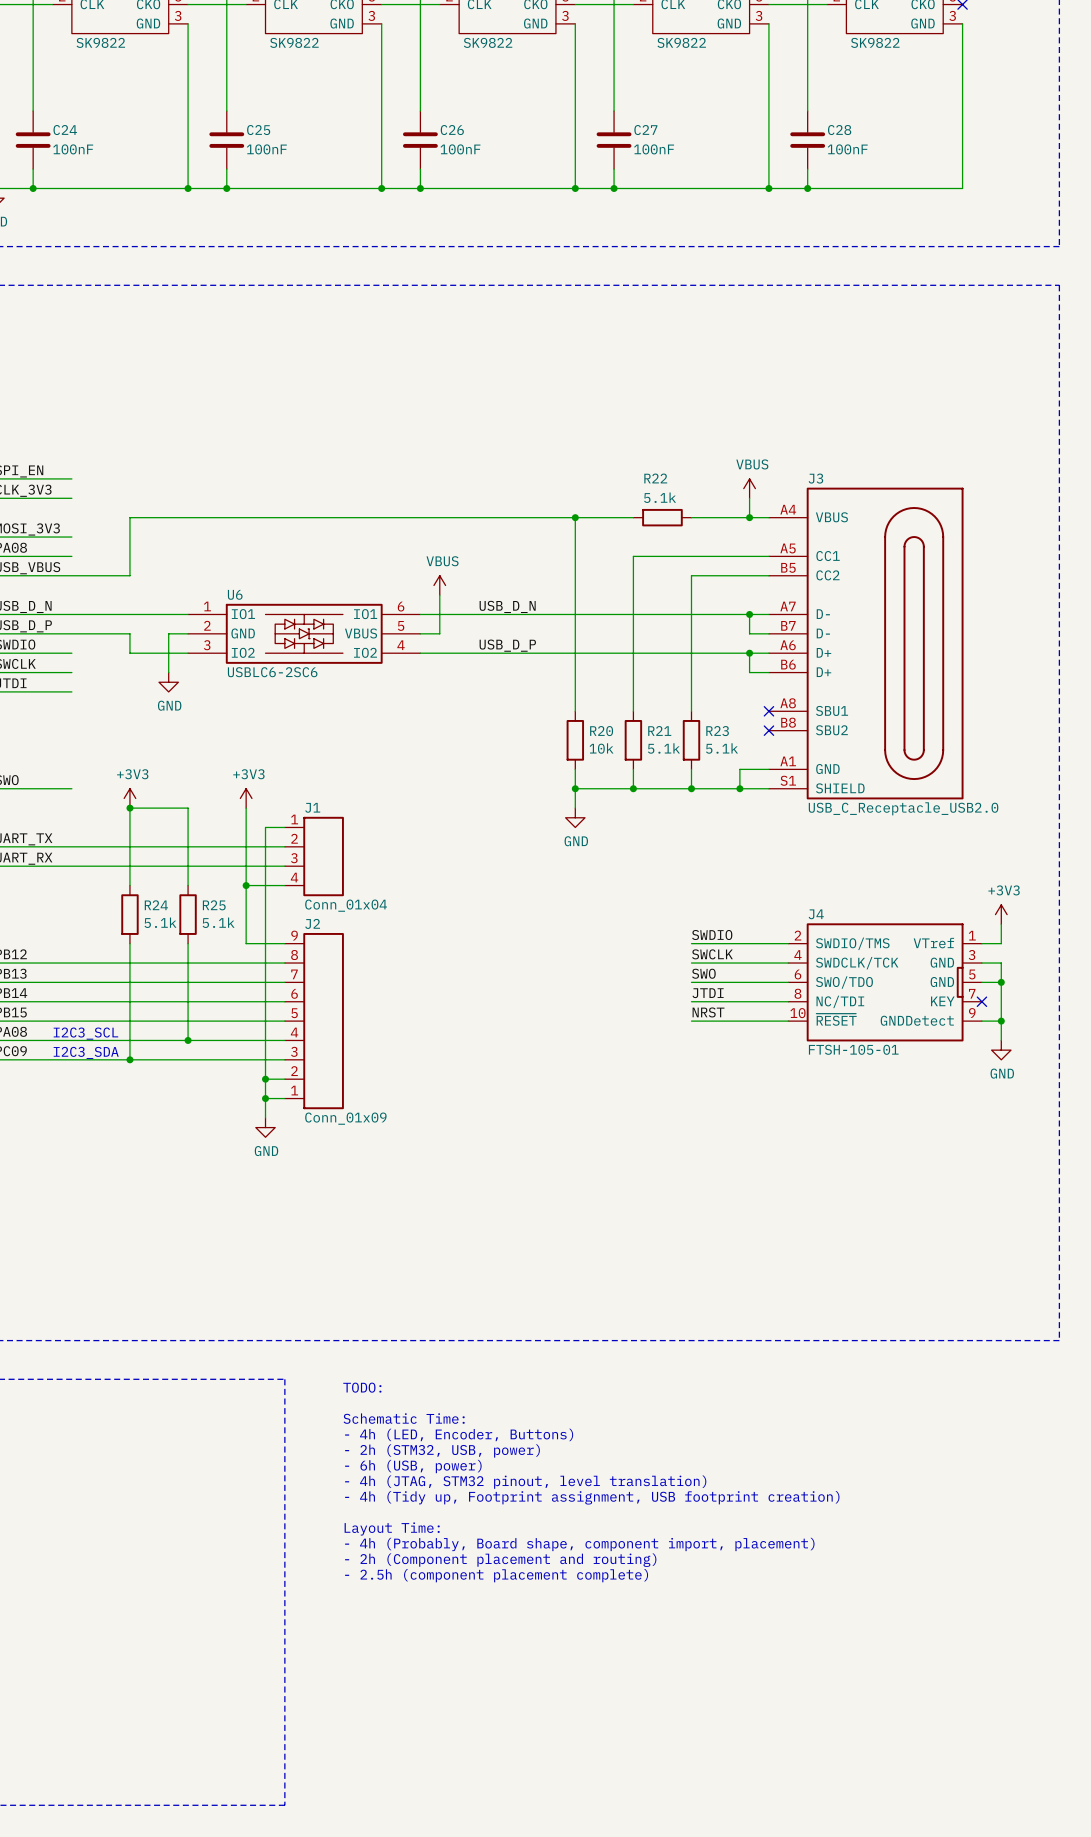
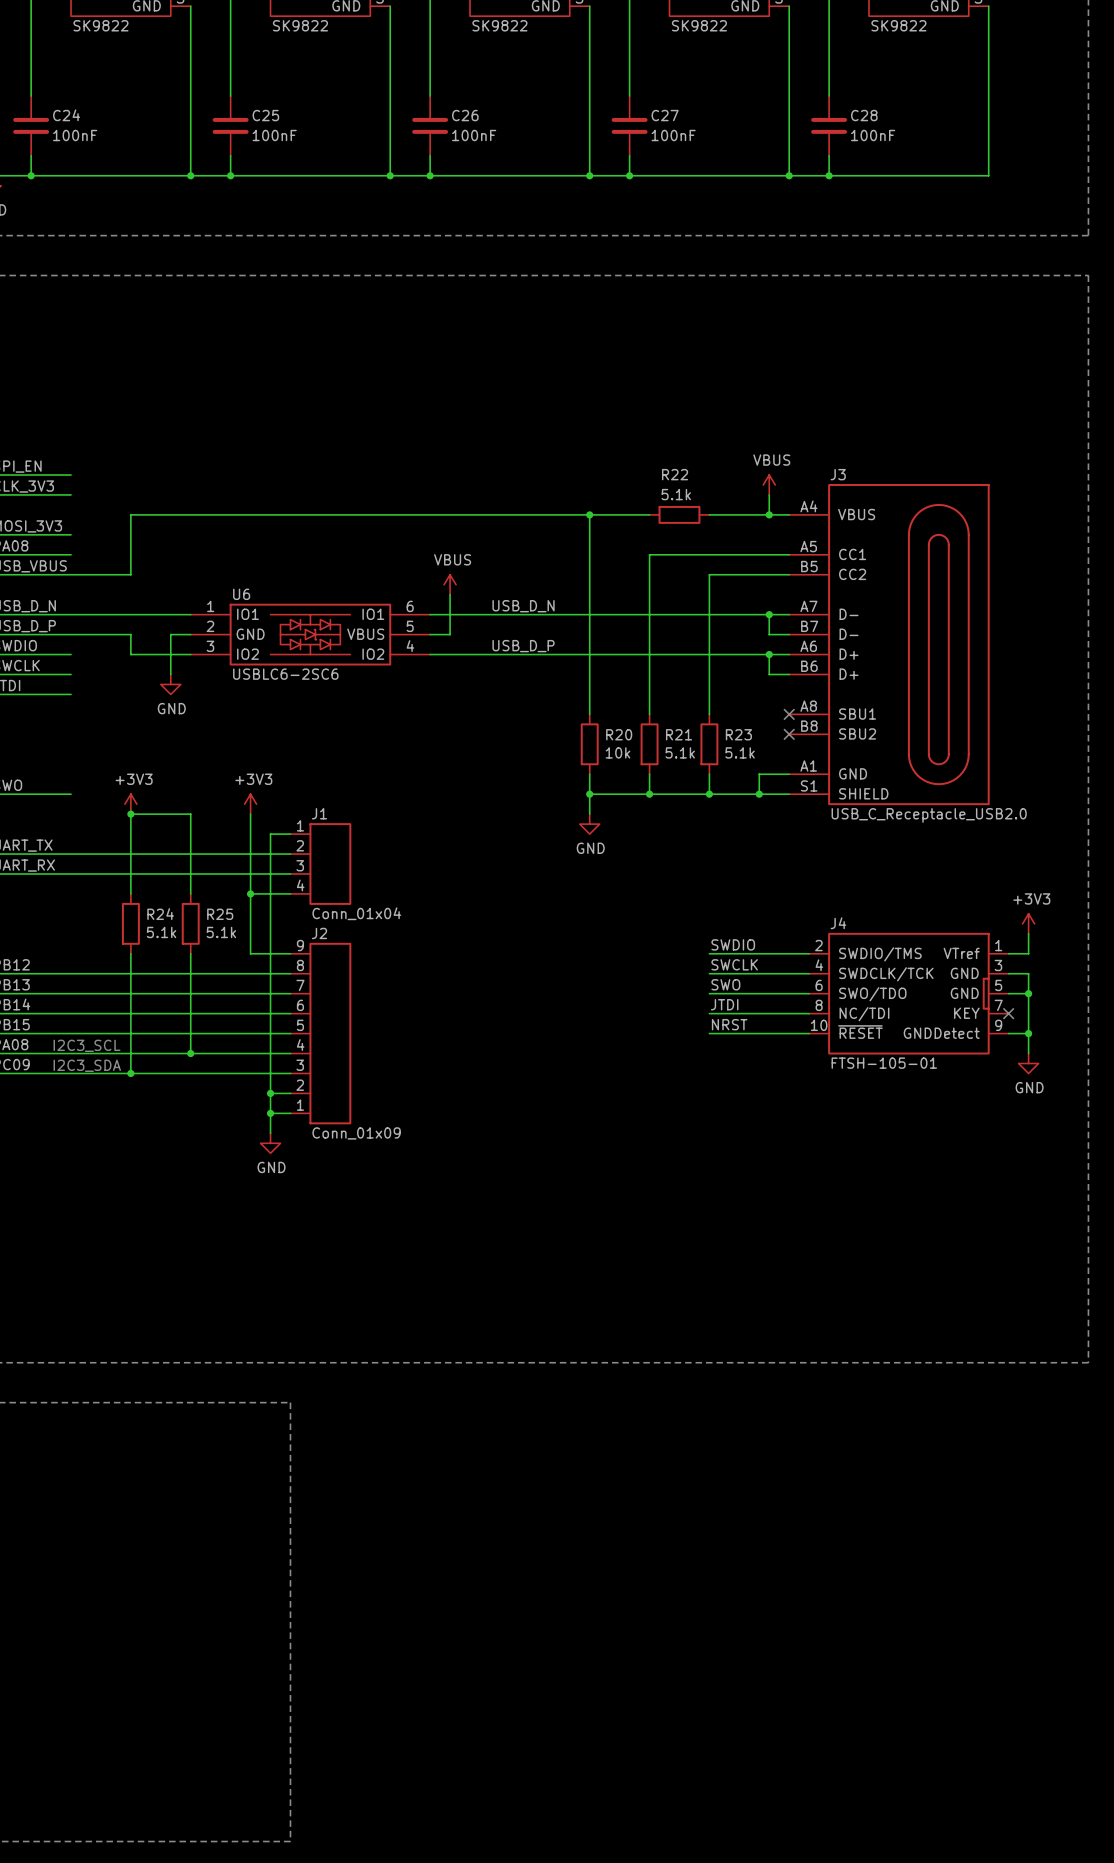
text: TODO: (362, 1387) -> none
text: Schematic Time: (404, 1418) -> none
text: - 4h (LED, Encoder, Buttons) (459, 1434) -> none
text: - 2h (STM32, USB, power) (442, 1450) -> none
text: - 6h (USB, power) (413, 1466) -> none
text: - 4h (JTAG, STM32 pinout, level translation) (525, 1482) -> none
text: - 4h (Tidy up, Footprint assignment, USB footprint creation) (592, 1497) -> none
text: Layout Time: (392, 1528) -> none
text: - 4h (Probably, Board shape, component import, placement) (579, 1544) -> none
text: - 2h (Component placement and routing) (500, 1560) -> none
text: - 2.5h (component placement complete) (496, 1575) -> none

